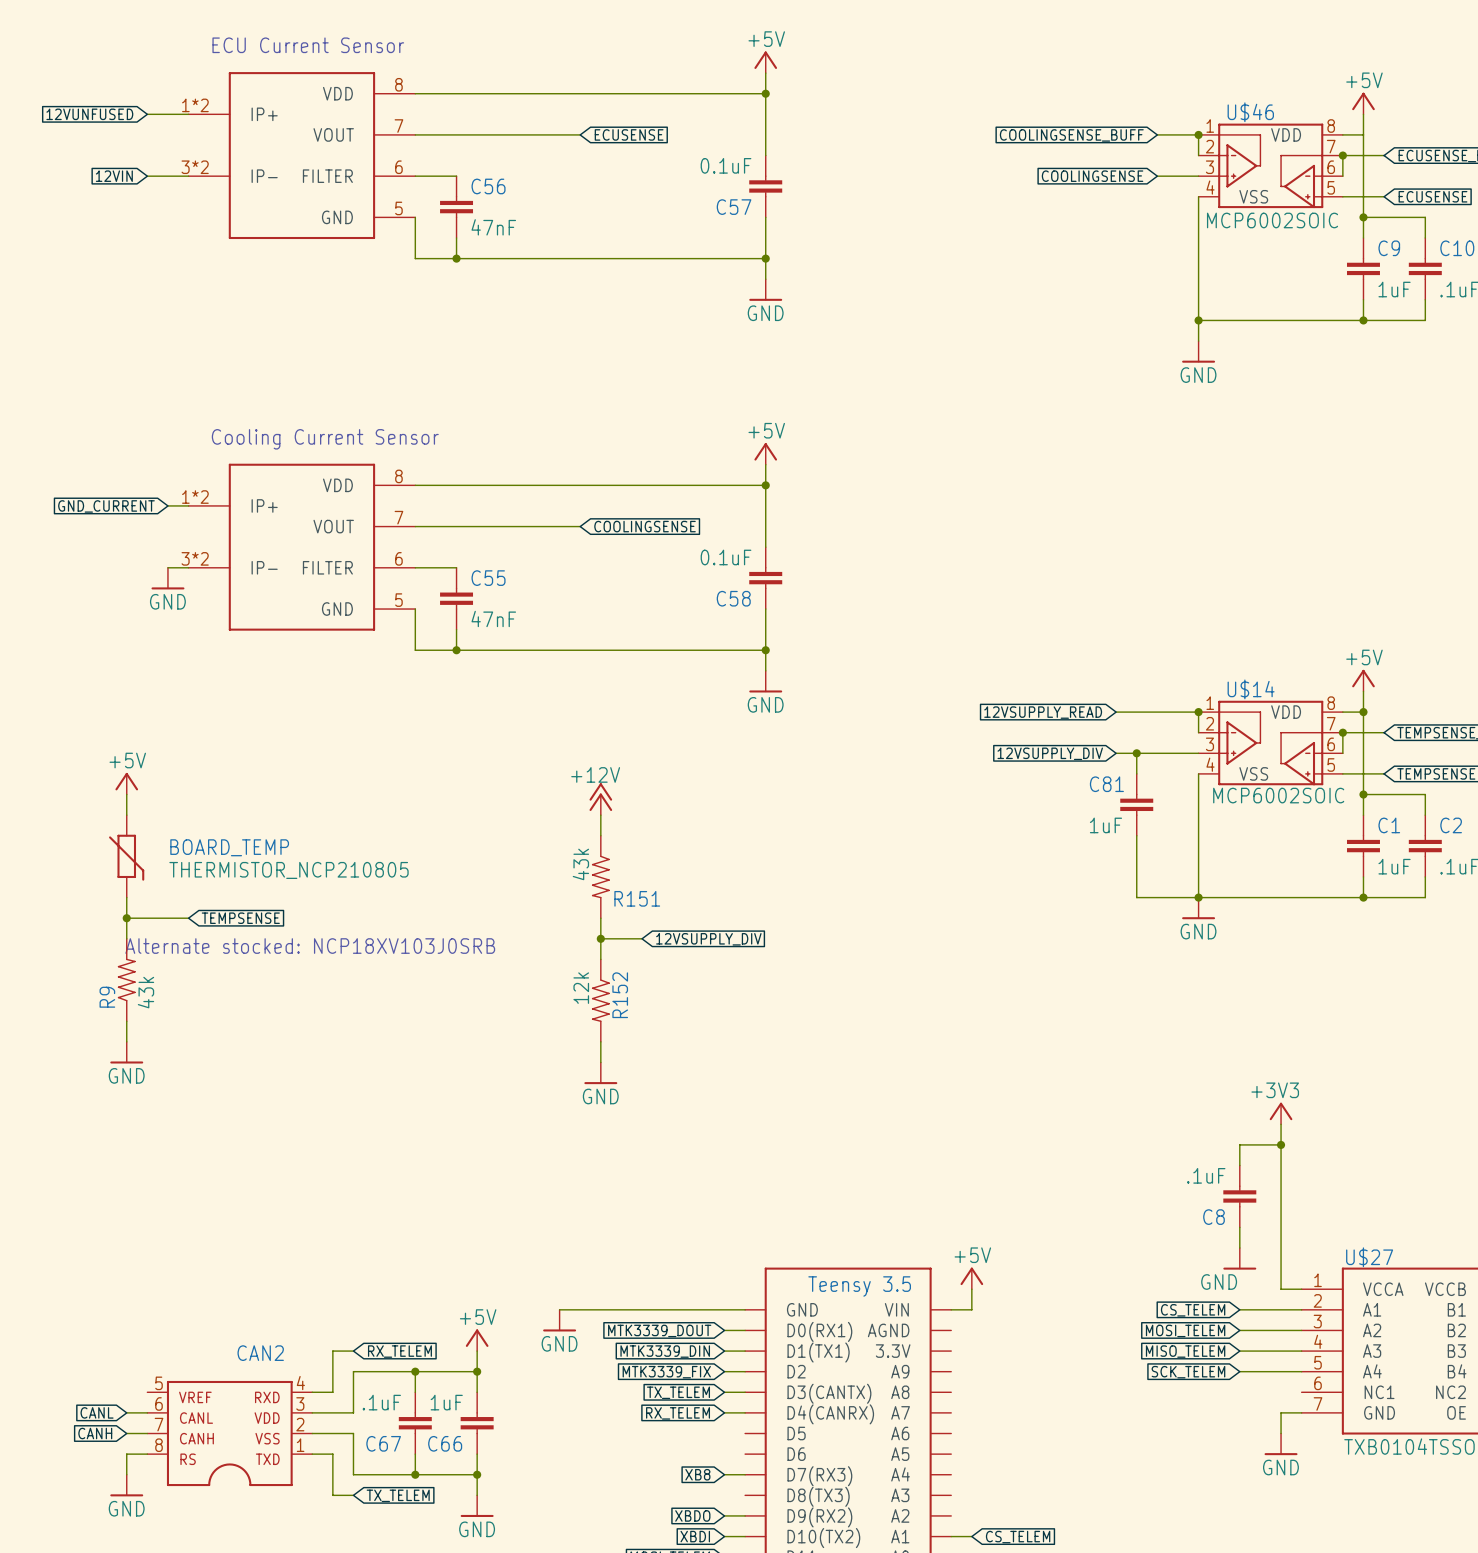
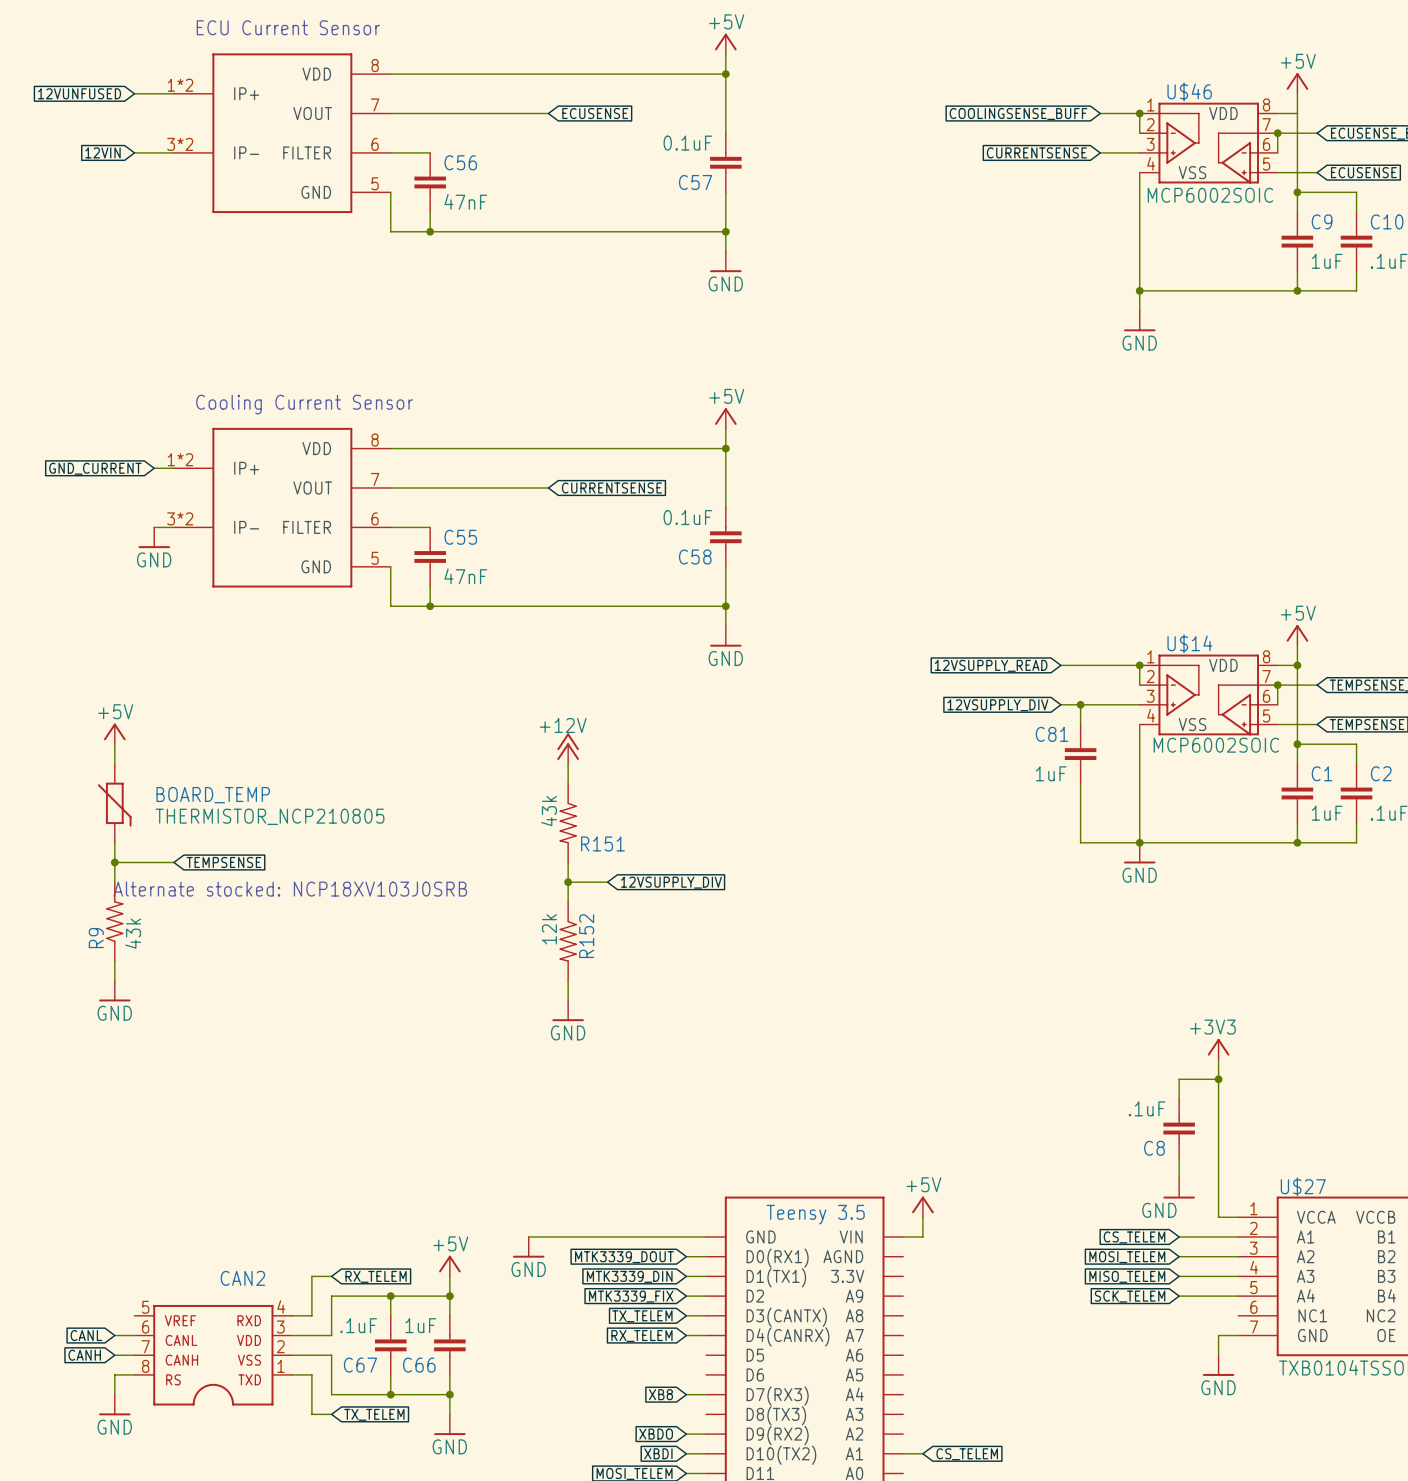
global label: COOLINGSENSE (1092, 176) -> CURRENTSENSE (1036, 152)
global label: COOLINGSENSE (645, 526) -> CURRENTSENSE (611, 487)

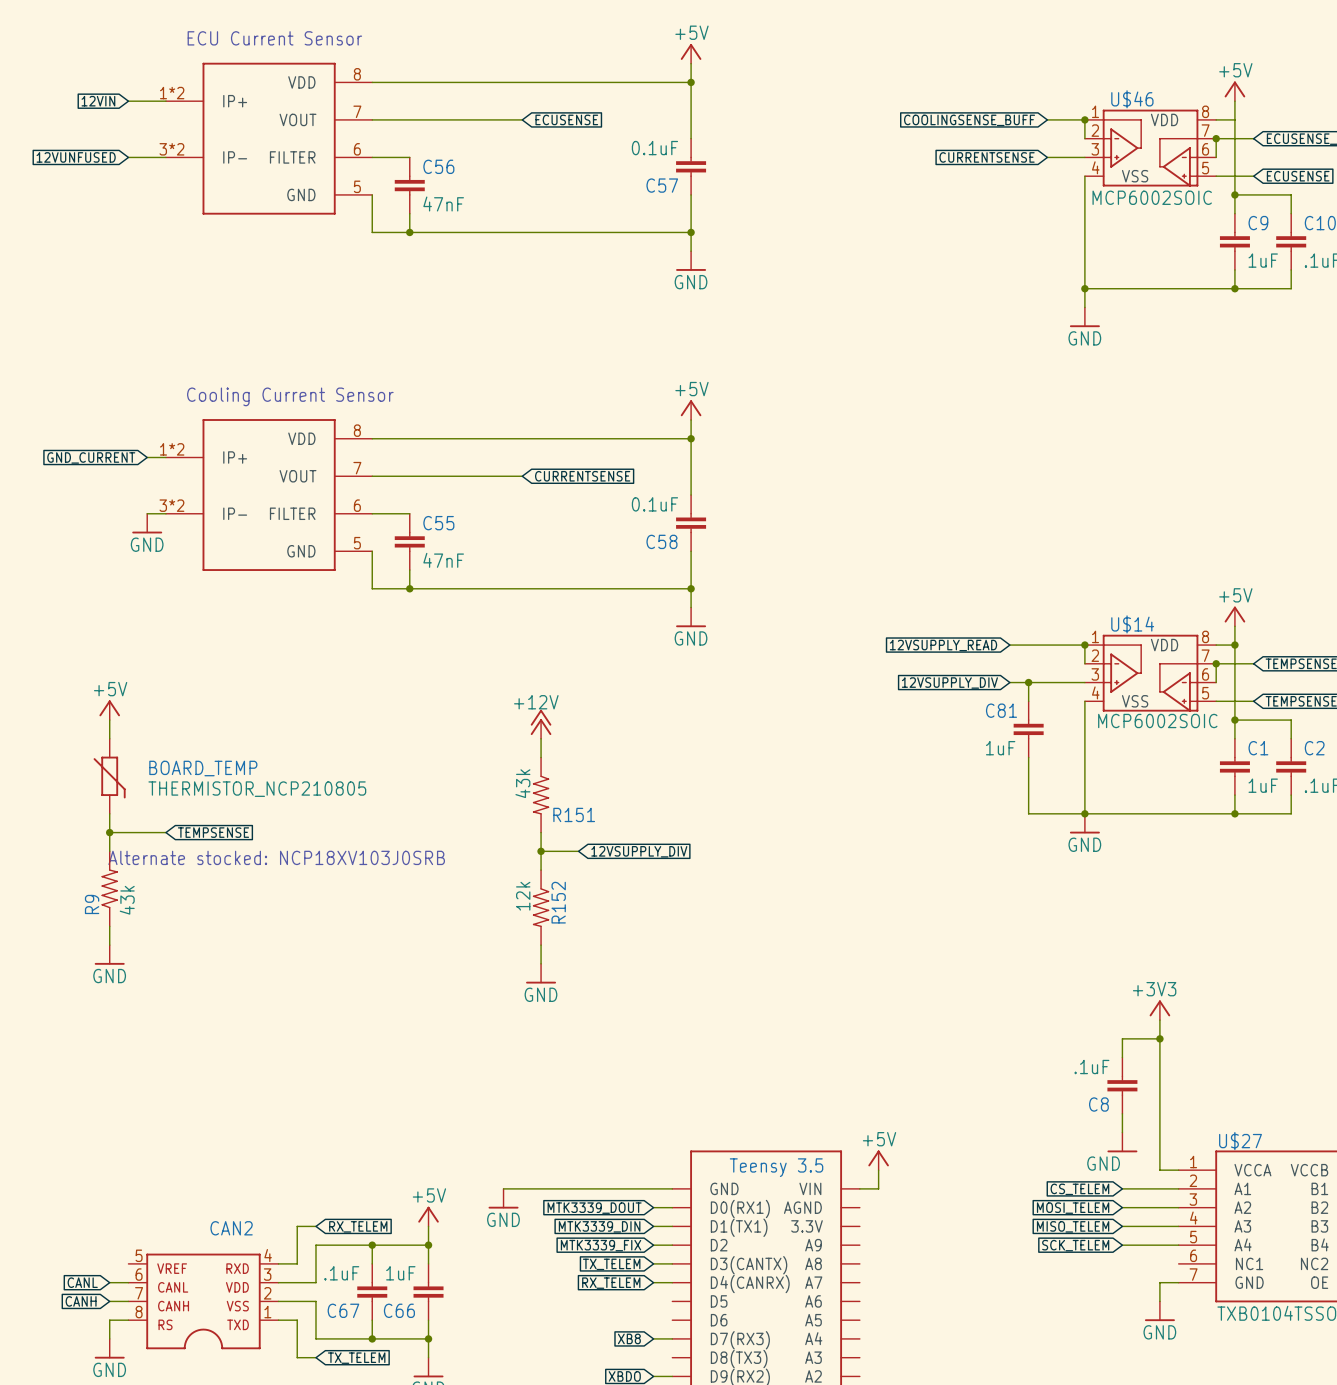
global label: 12VUNFUSED (79, 93) -> 12VIN (98, 101)
global label: 12VIN (102, 152) -> 12VUNFUSED (76, 157)

